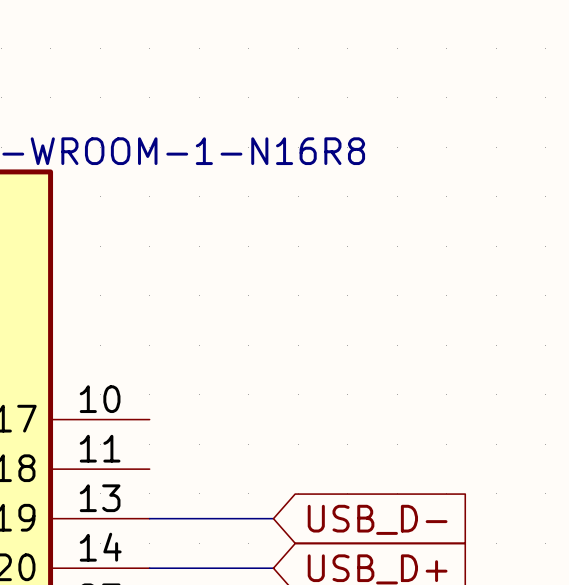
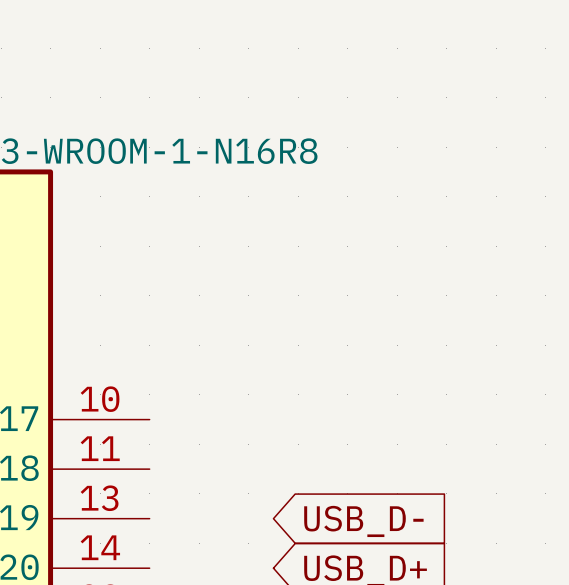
wire: (149, 518) (273, 518) -> none
wire: (149, 568) (273, 568) -> none

